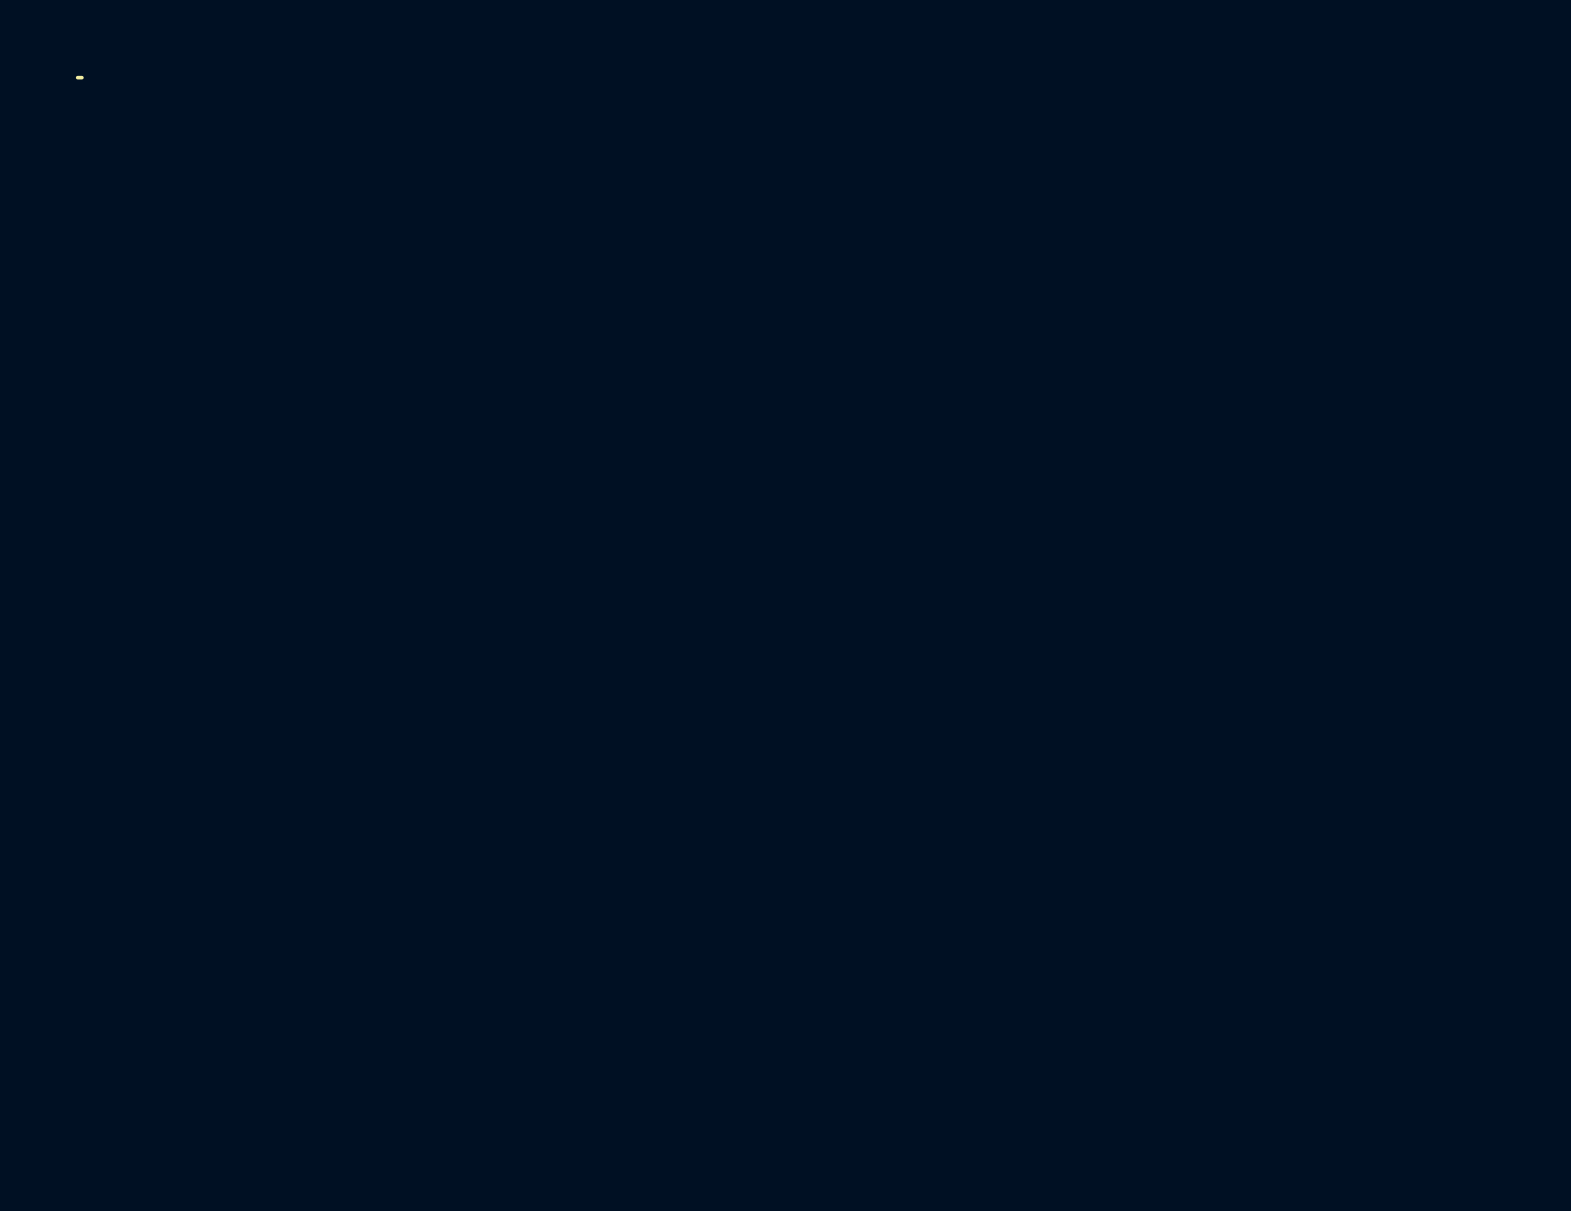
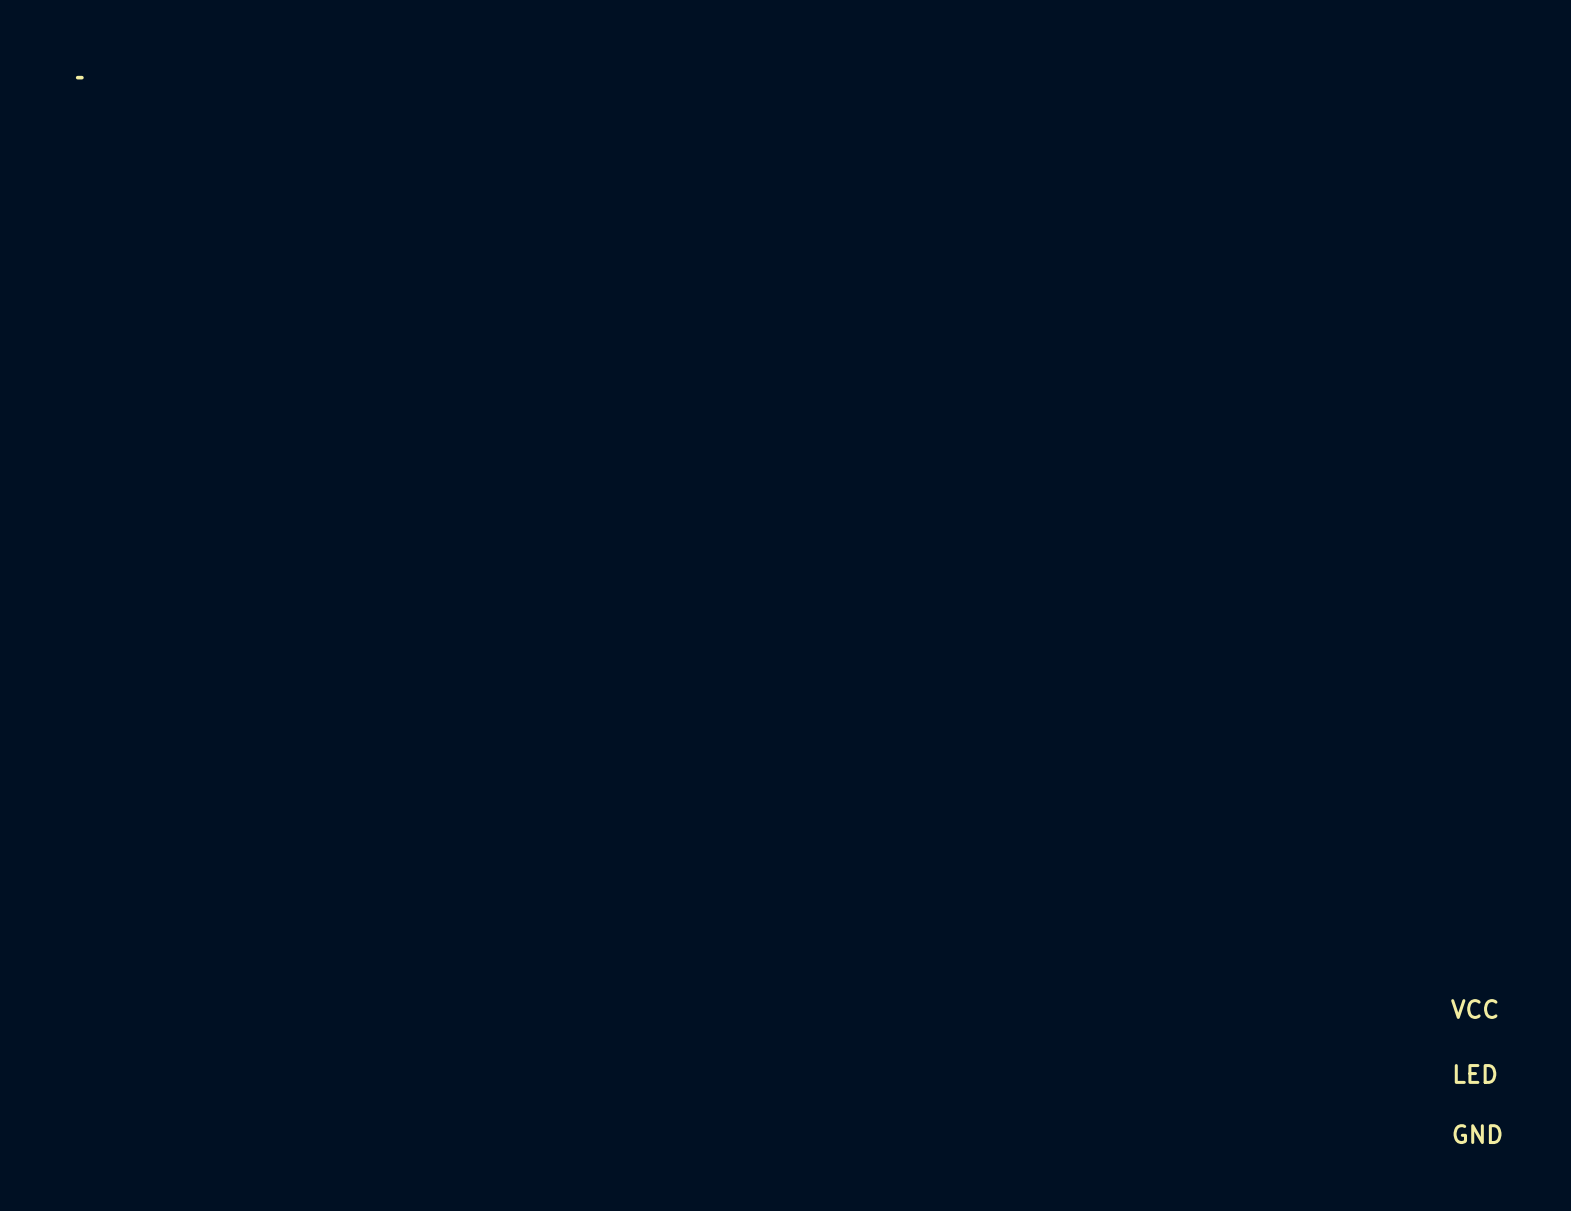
text: none -> VCC (1474, 1009)
text: none -> LED (1475, 1073)
text: none -> GND (1477, 1134)

